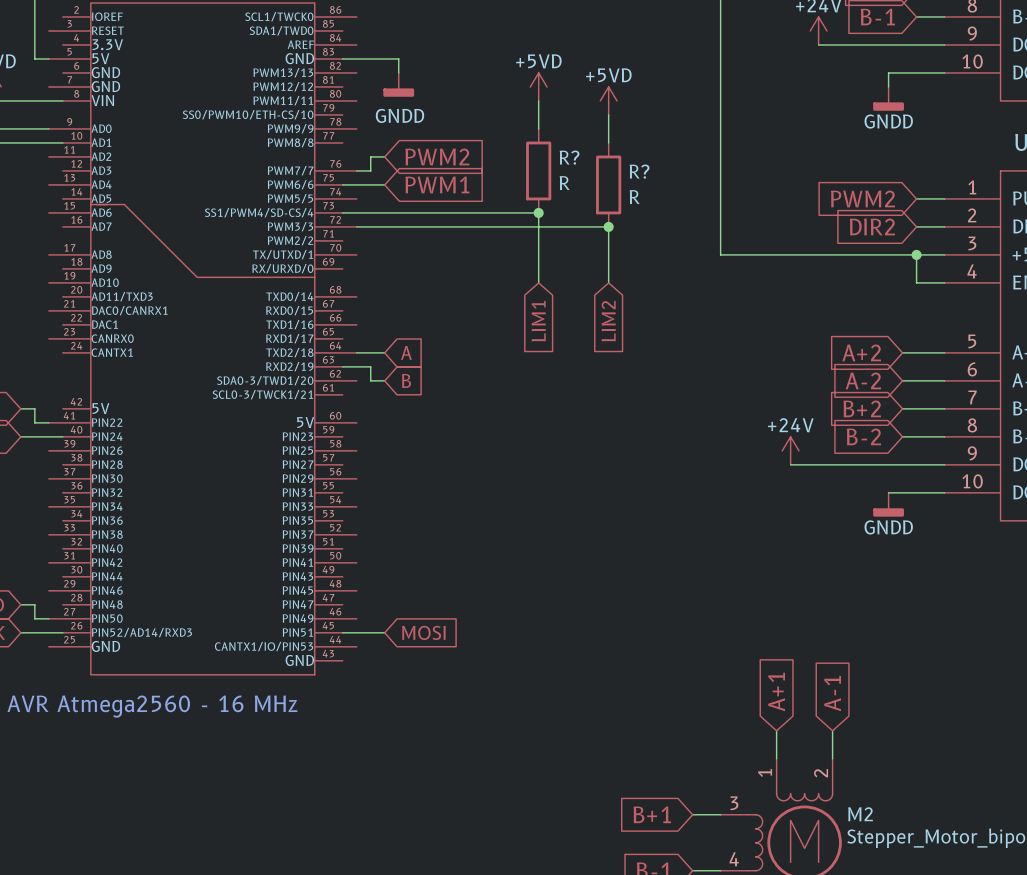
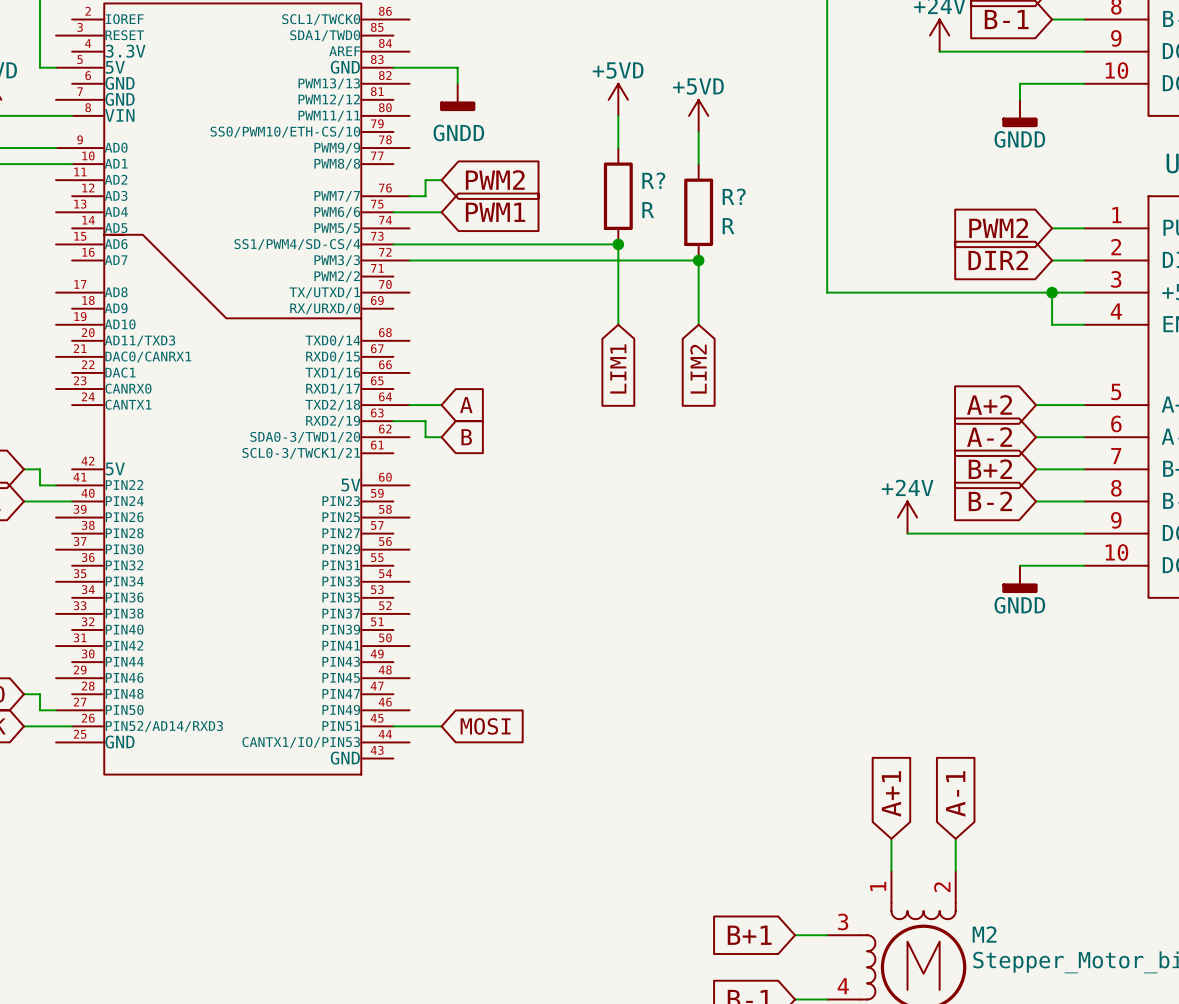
text: AVR Atmega2560 - 16 MHz (152, 706) -> none

